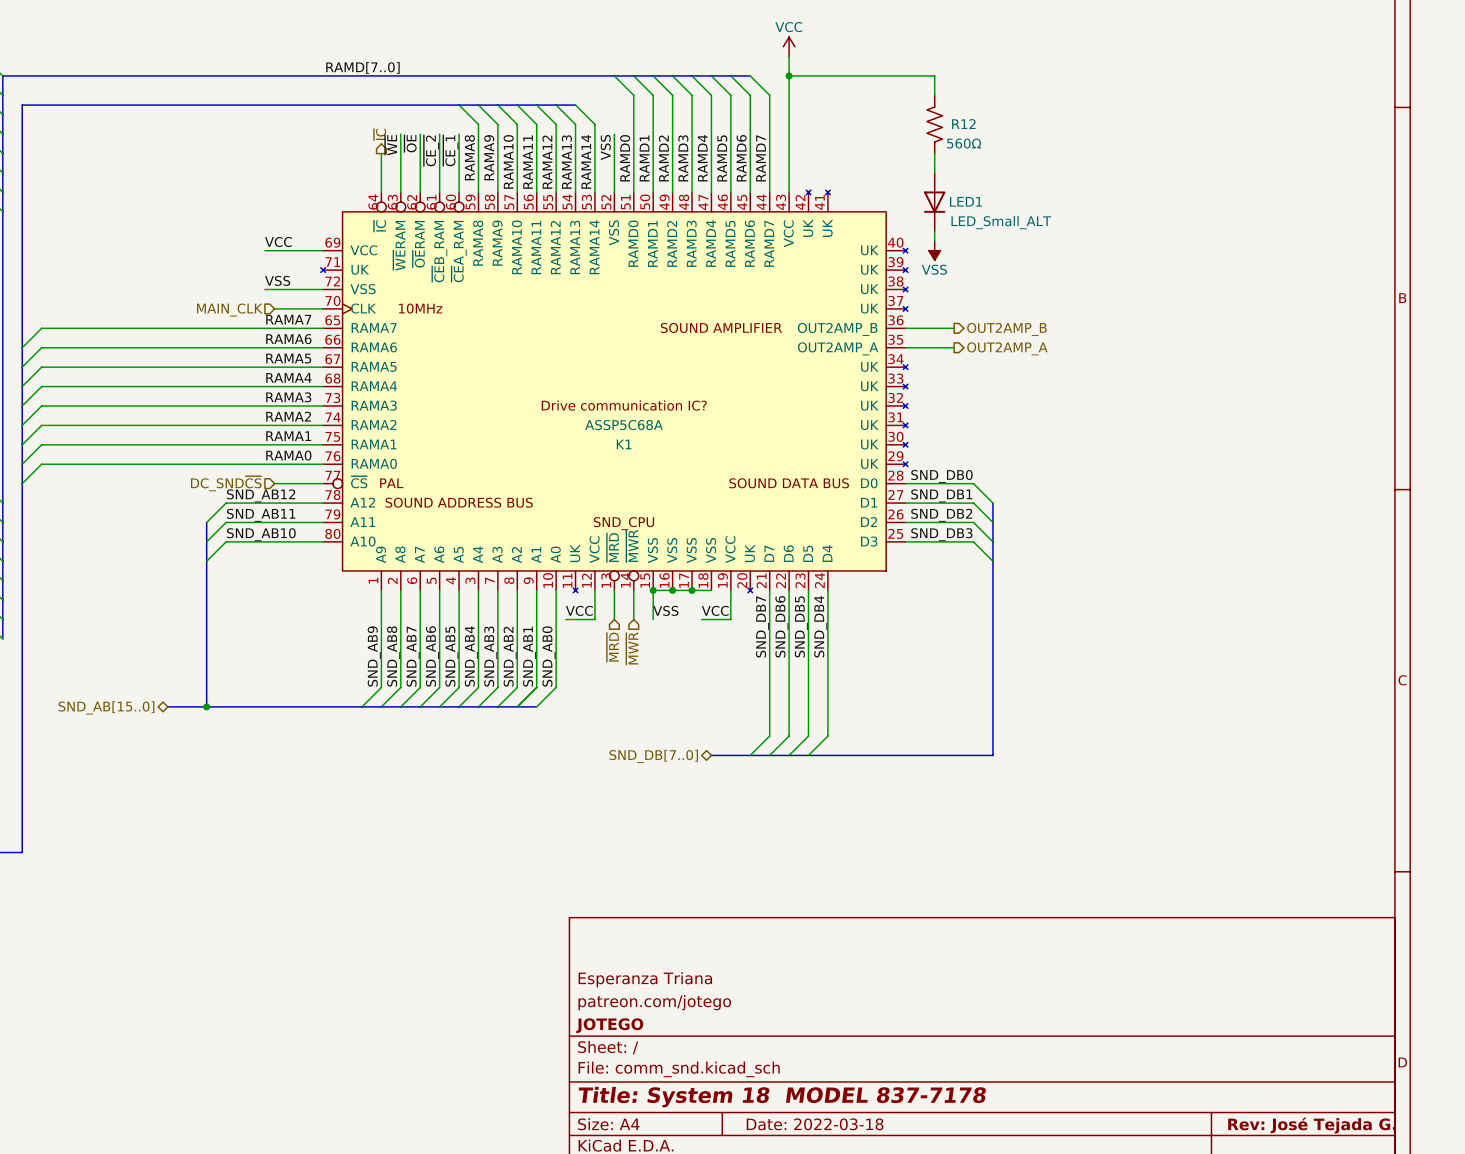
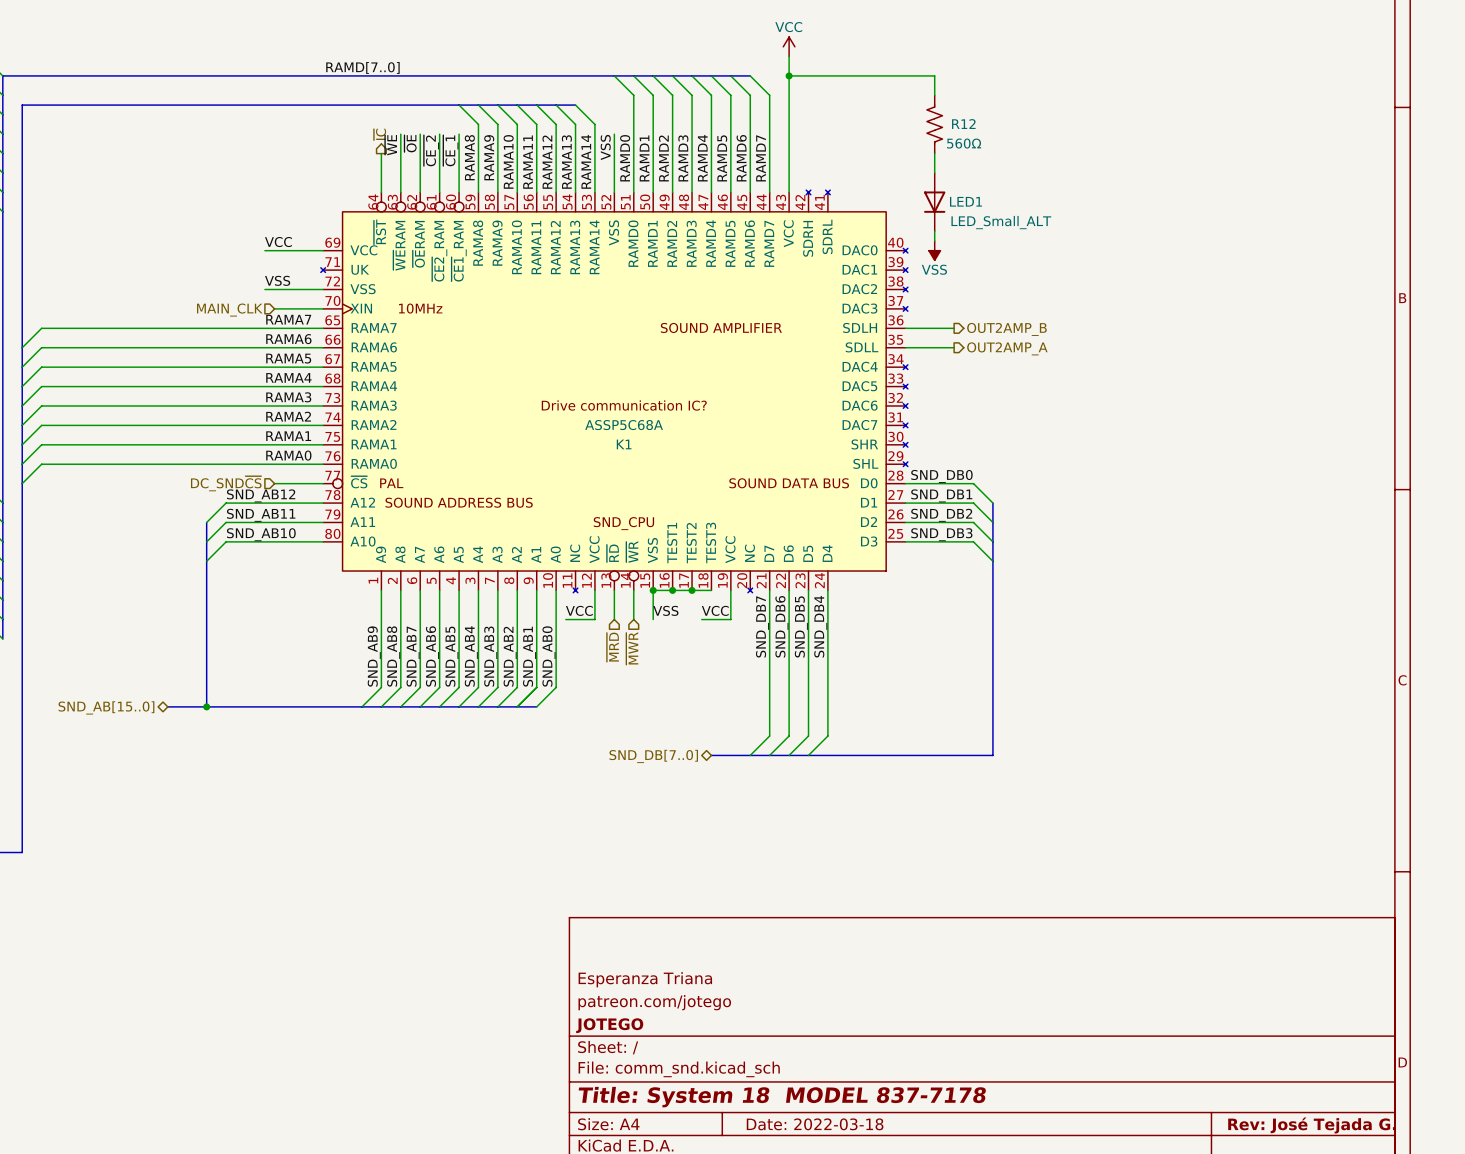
K1 symbol: [320, 190, 908, 593] -> [320, 190, 908, 593]

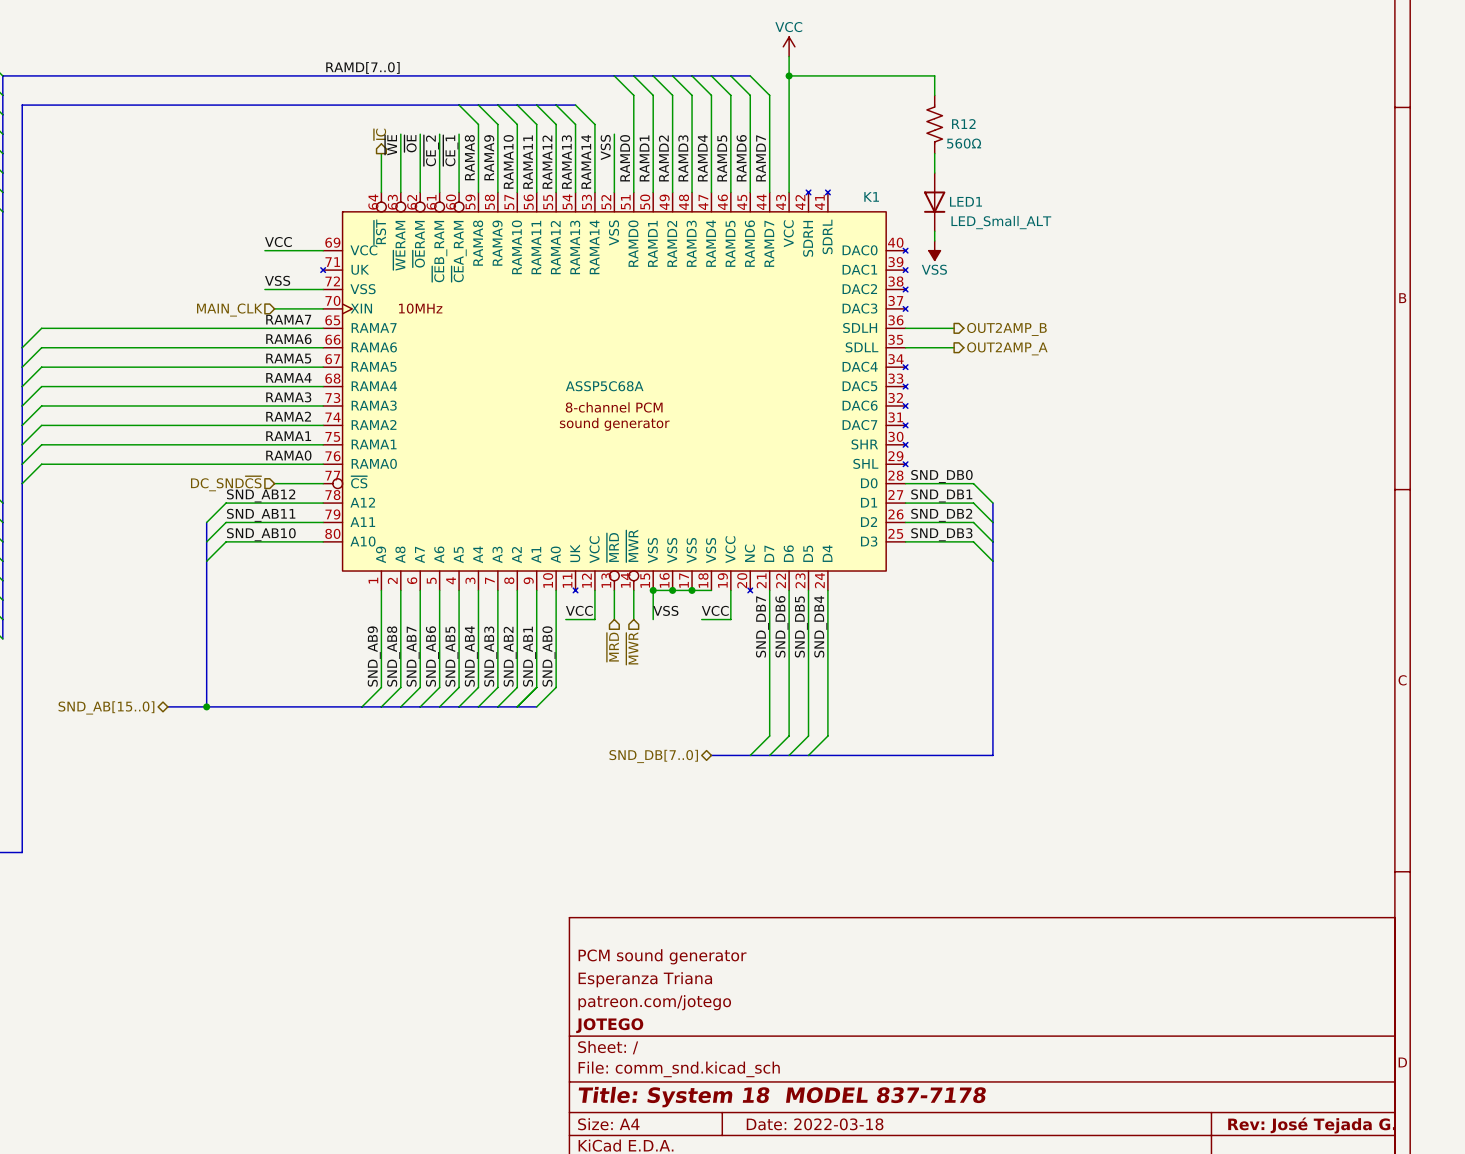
K1 symbol: [320, 190, 908, 593] -> [320, 190, 908, 593]
K1 value position: ASSP5C68A (624, 425) -> ASSP5C68A (604, 386)
K1 name position: K1 (624, 444) -> K1 (871, 196)
title block: none -> PCM sound generator (662, 956)

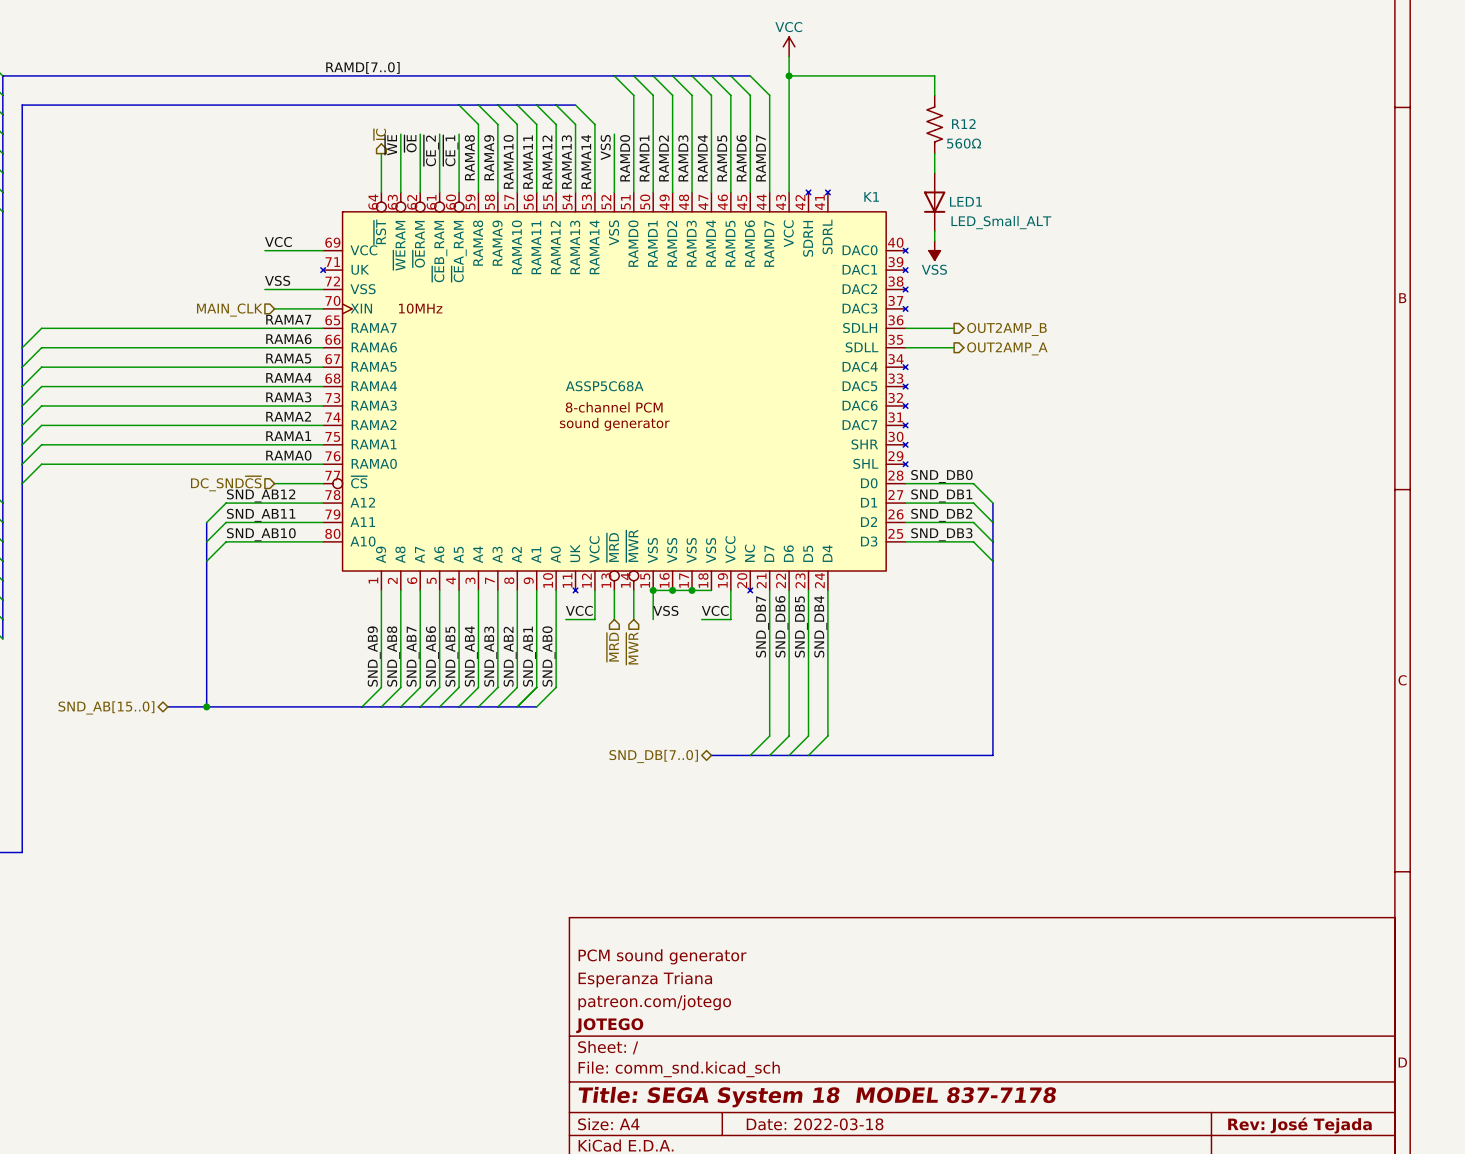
title block: Title: System 18 MODEL 837-7178 (782, 1097) -> Title: SEGA System 18 MODEL 837-7178 (817, 1097)
title block: Rev: José Tejada G. (1311, 1125) -> Rev: José Tejada (1299, 1125)

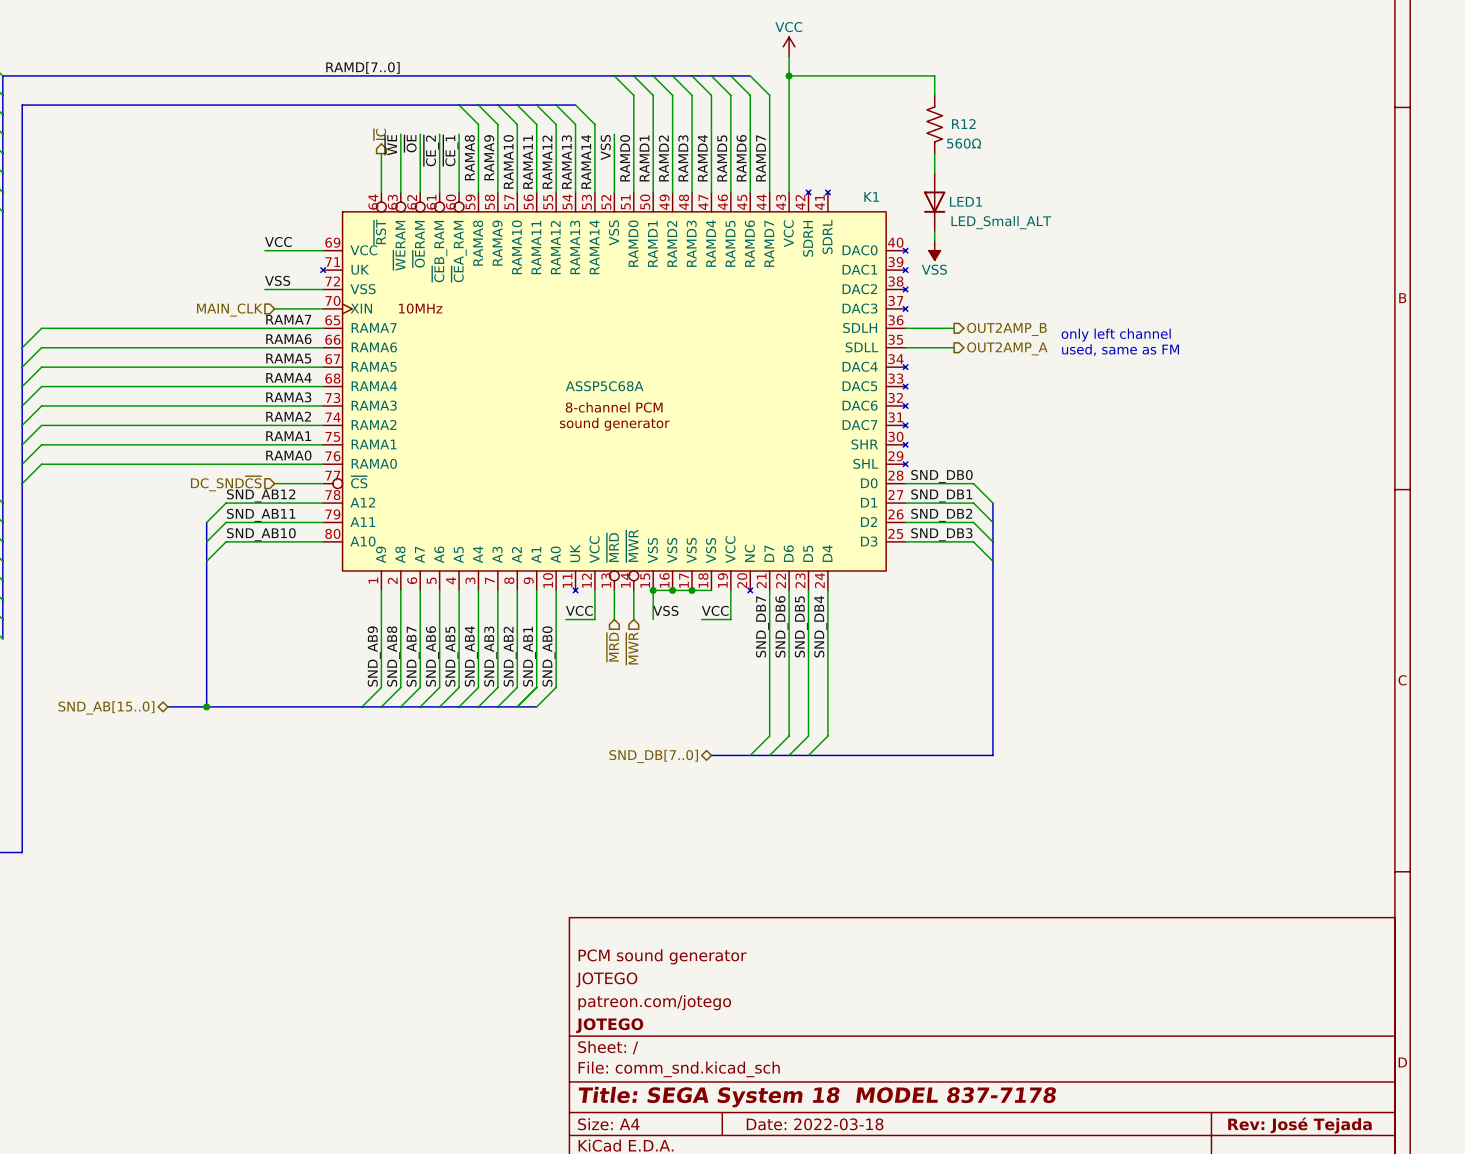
text: none -> only left channel (1116, 335)
text: none -> used, same as FM (1120, 350)
title block: Esperanza Triana (645, 979) -> JOTEGO (606, 979)

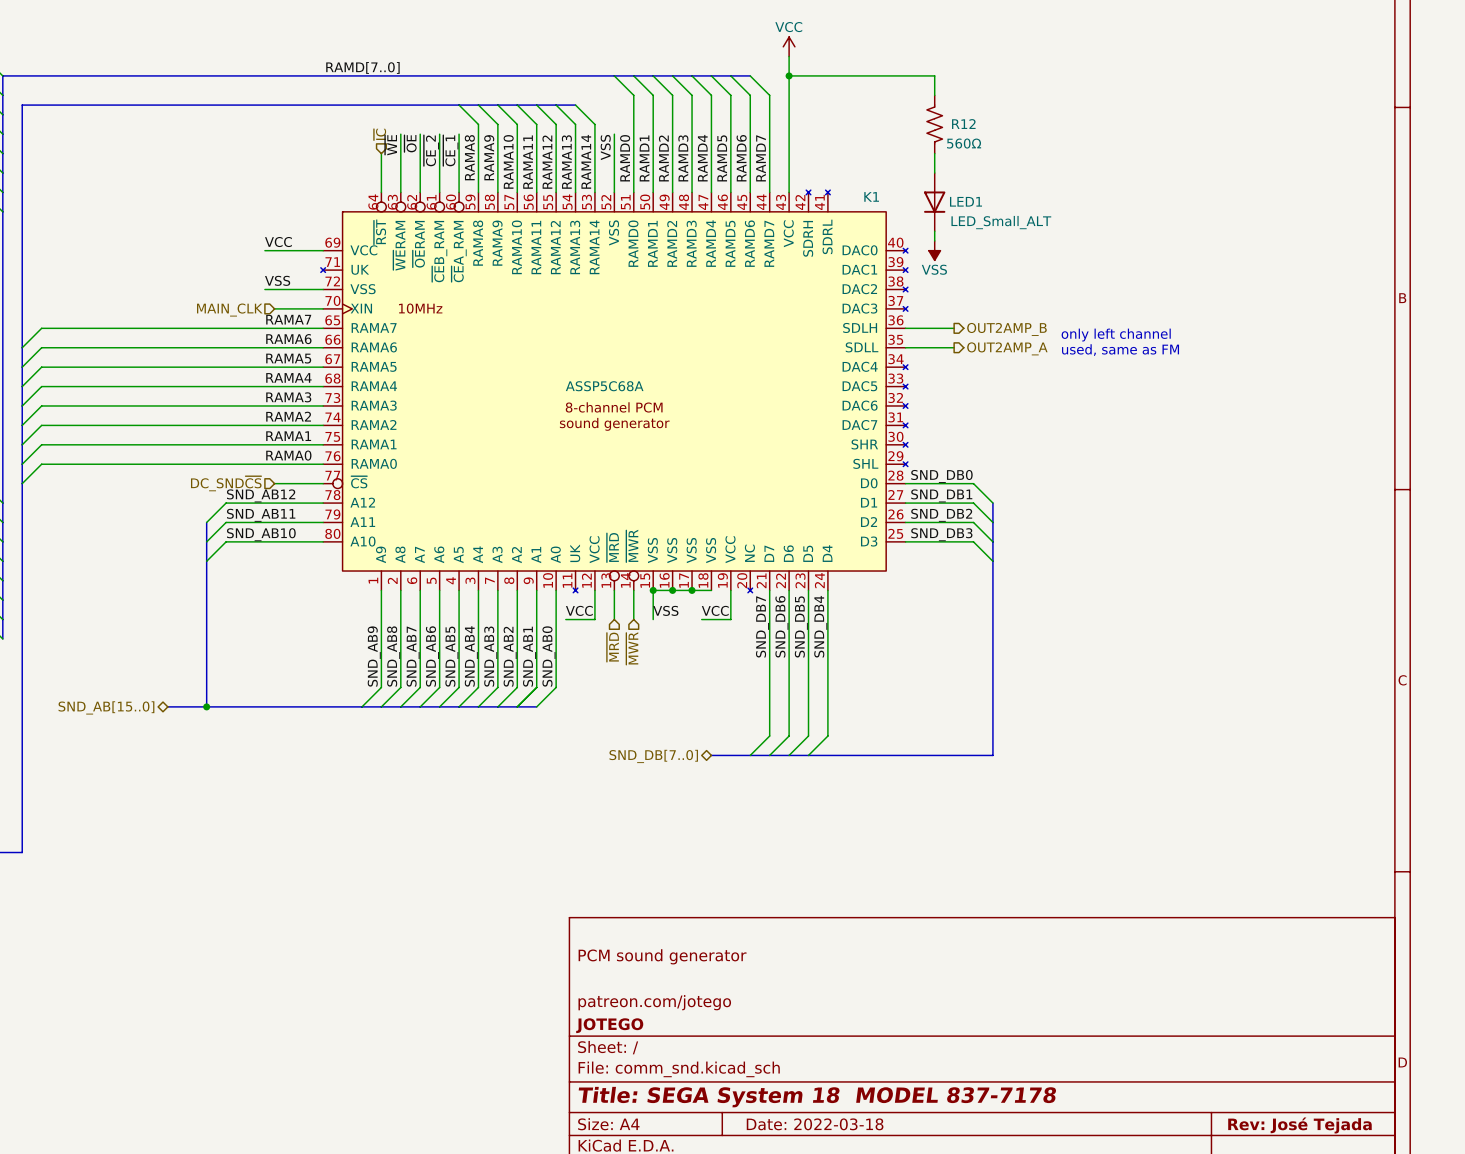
hierarchical label shape: output (380, 134) -> input (380, 134)
title block: JOTEGO (606, 979) -> none

